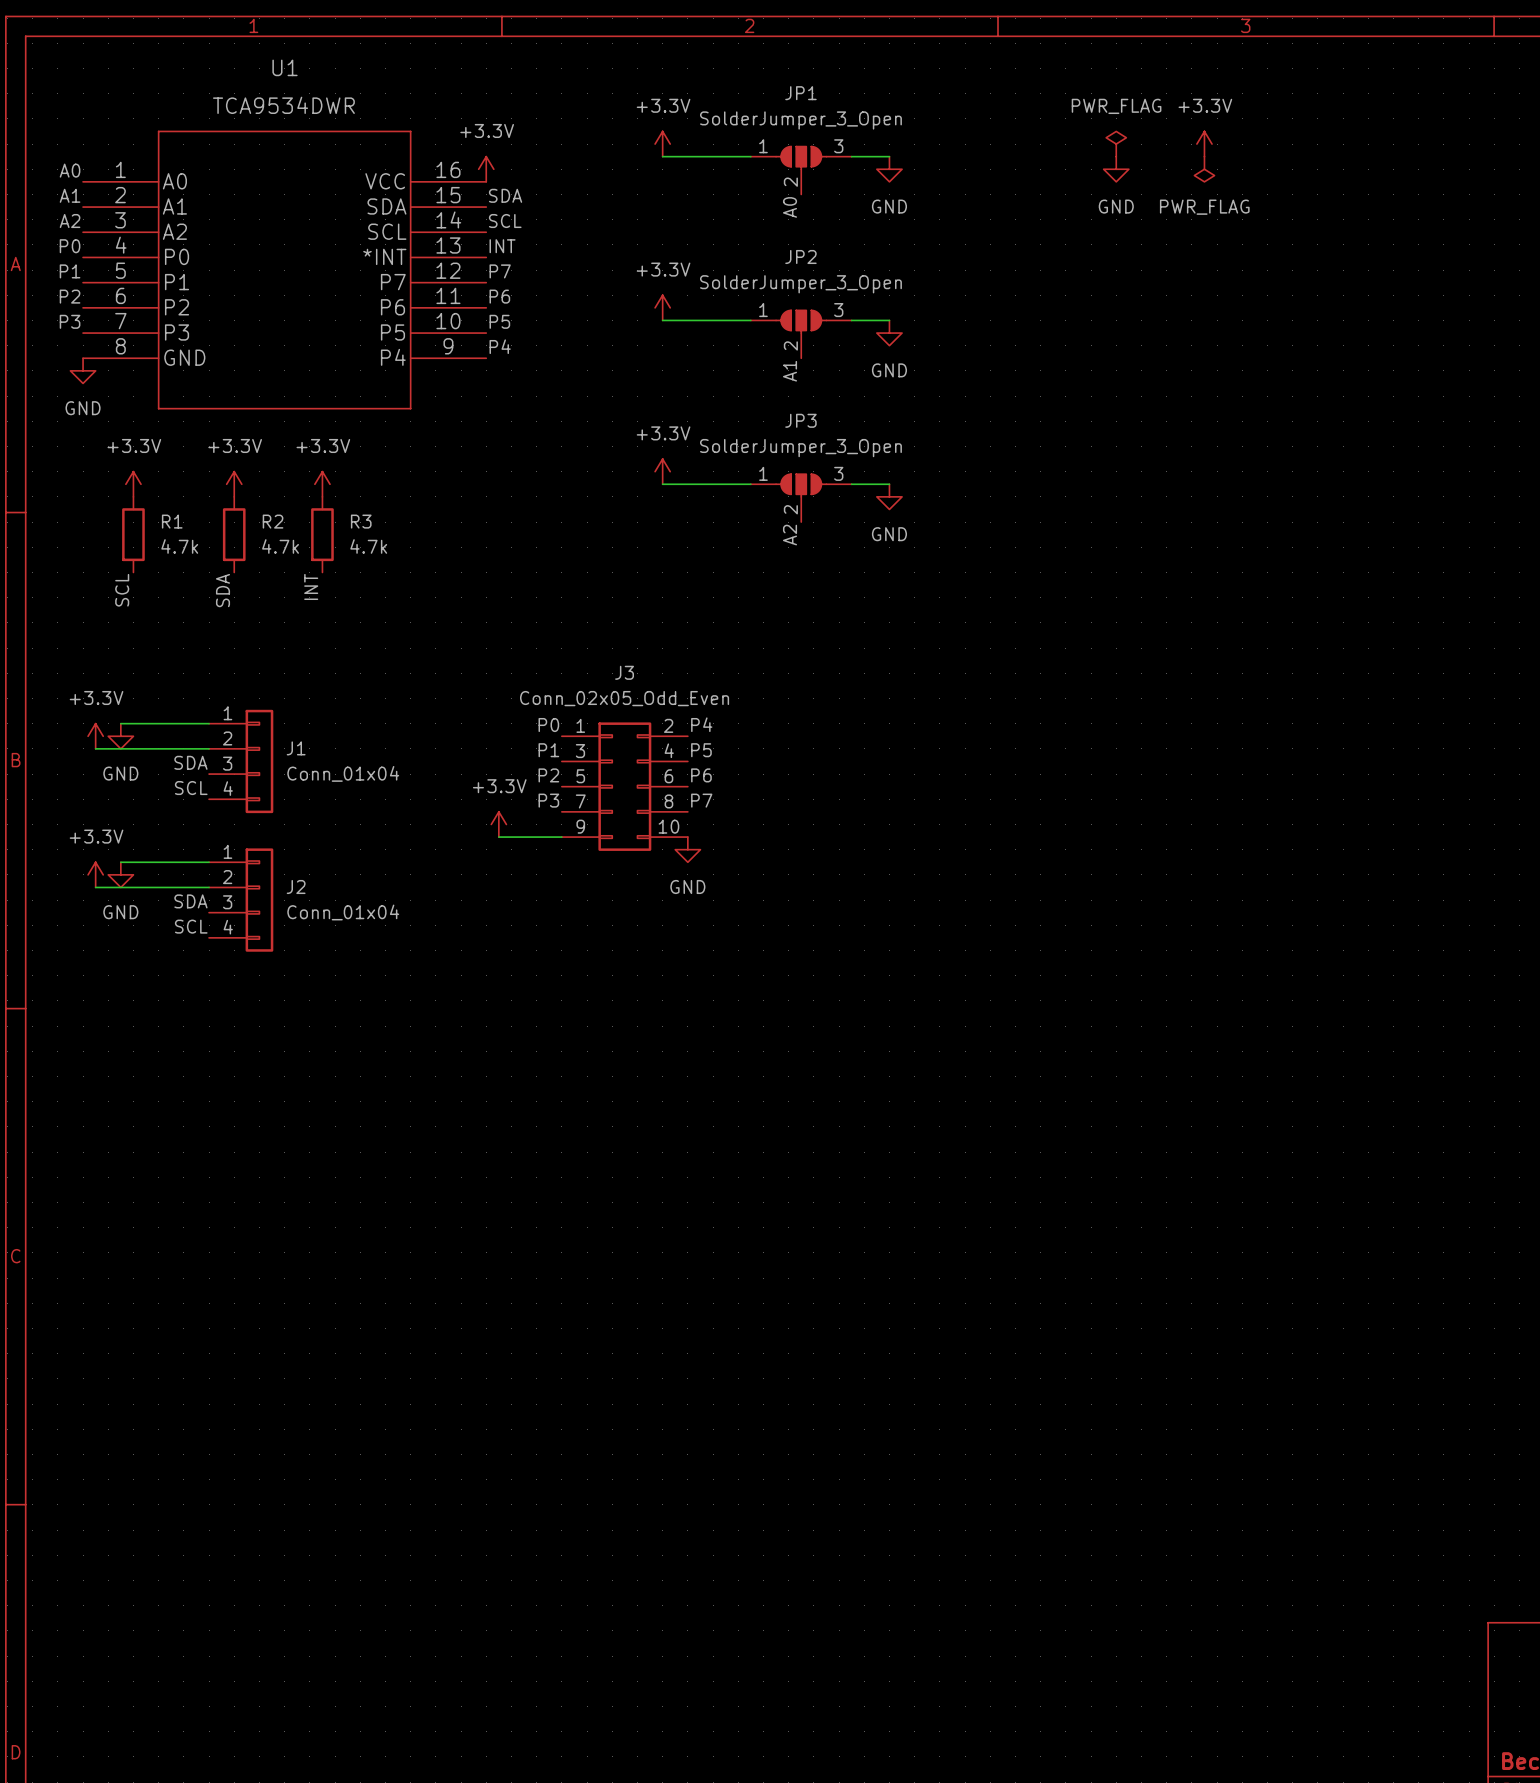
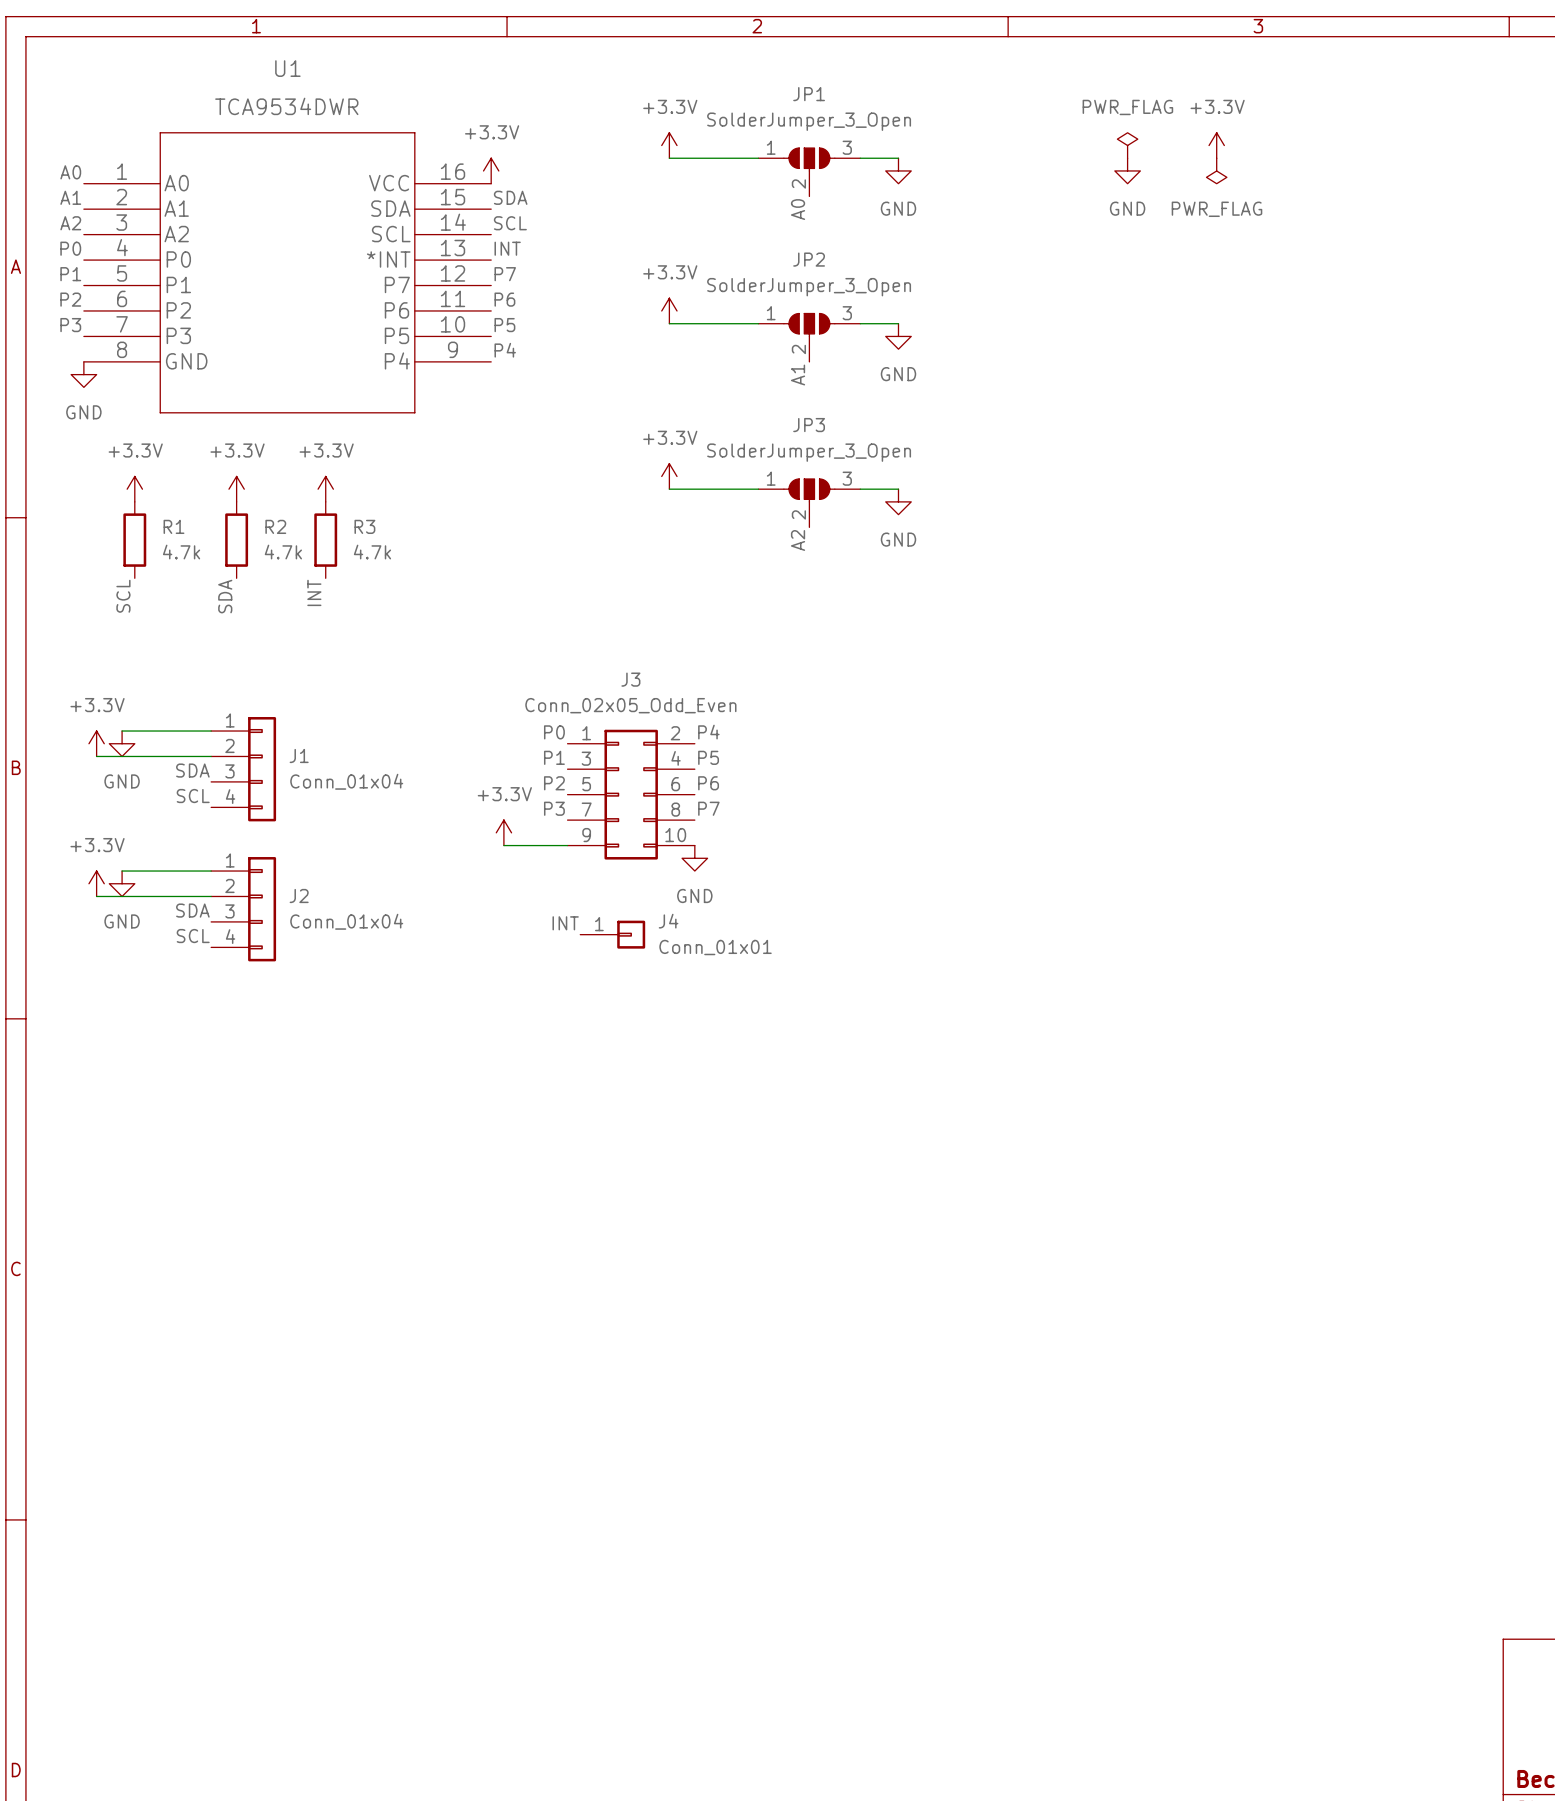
label: none -> INT (565, 923)
J4: none -> Conn_01x01 (612, 934)

